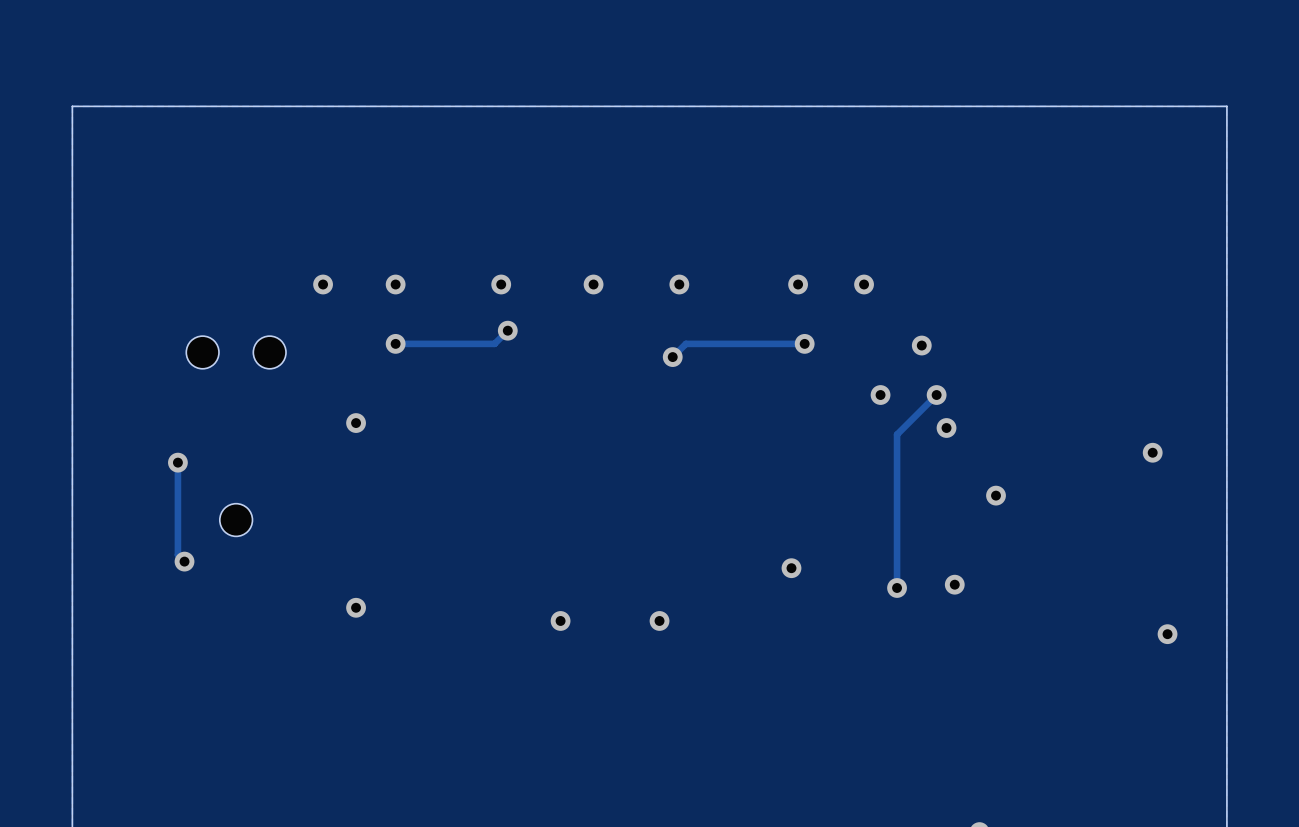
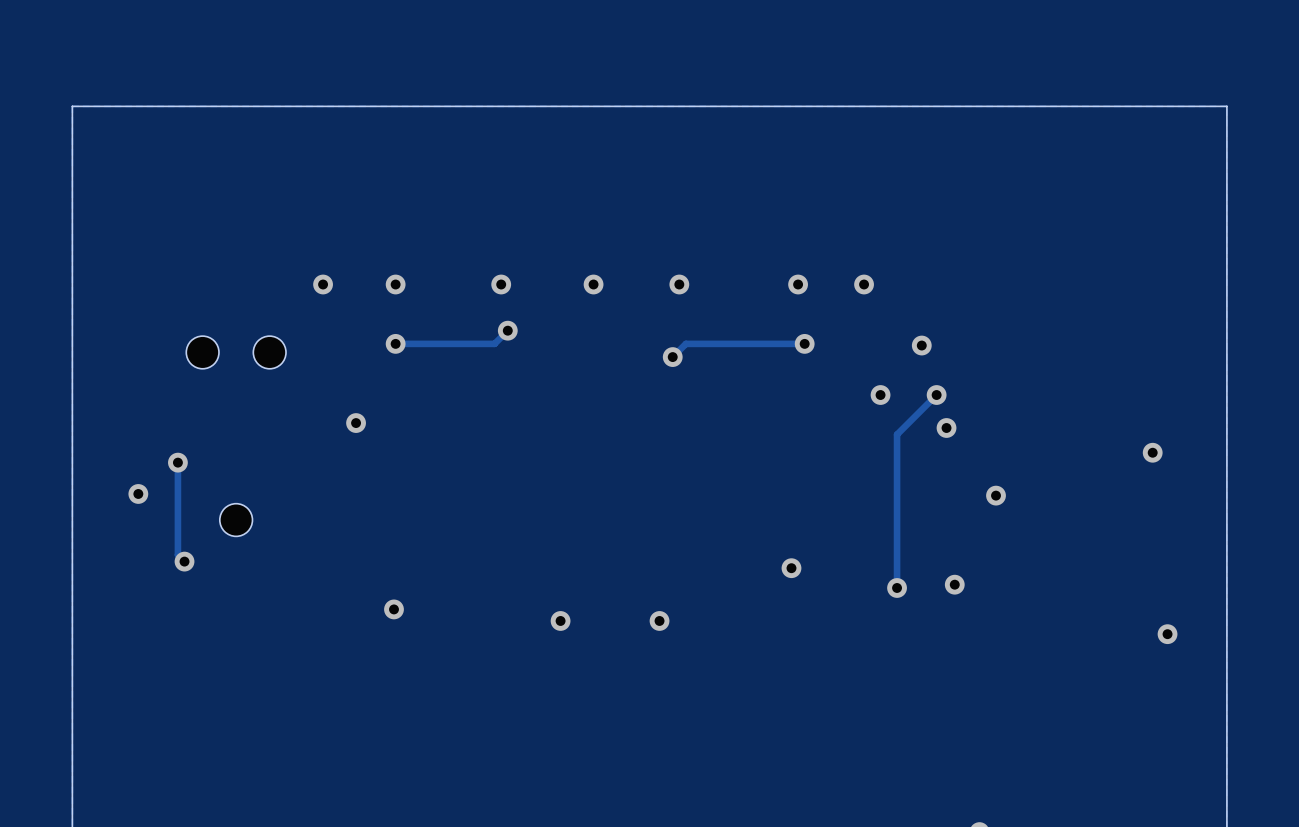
via: none -> (138, 493)
via position: (356, 607) -> (393, 609)

